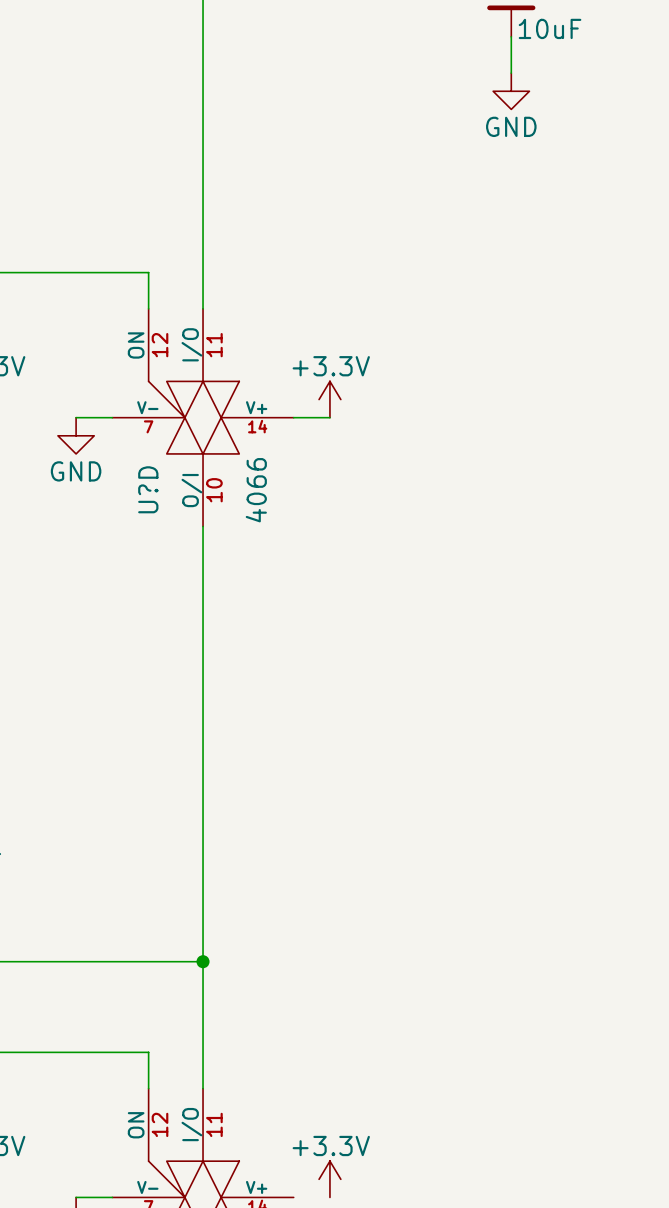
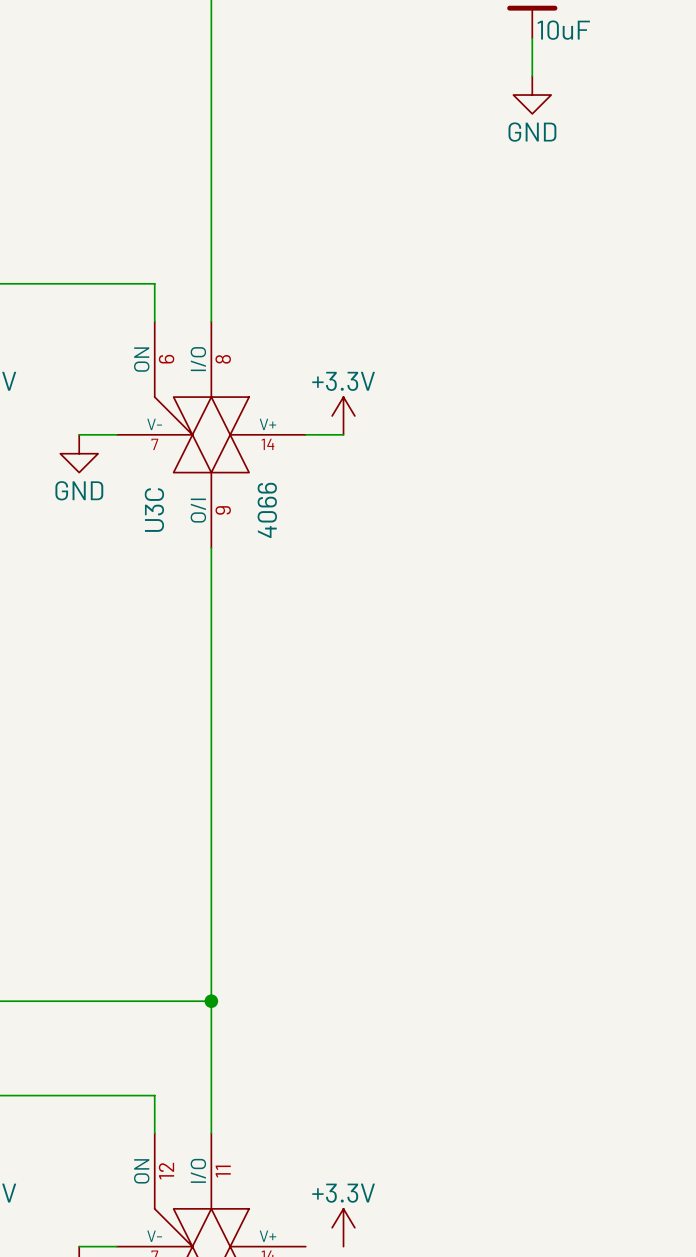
U?D pin number: 12 (160, 345) -> 6 (166, 359)
U?D pin number: 11 (214, 345) -> 8 (223, 359)
U?D name: U?D (148, 489) -> U3C (154, 510)
U?D pin number: 10 (214, 490) -> 9 (223, 510)

